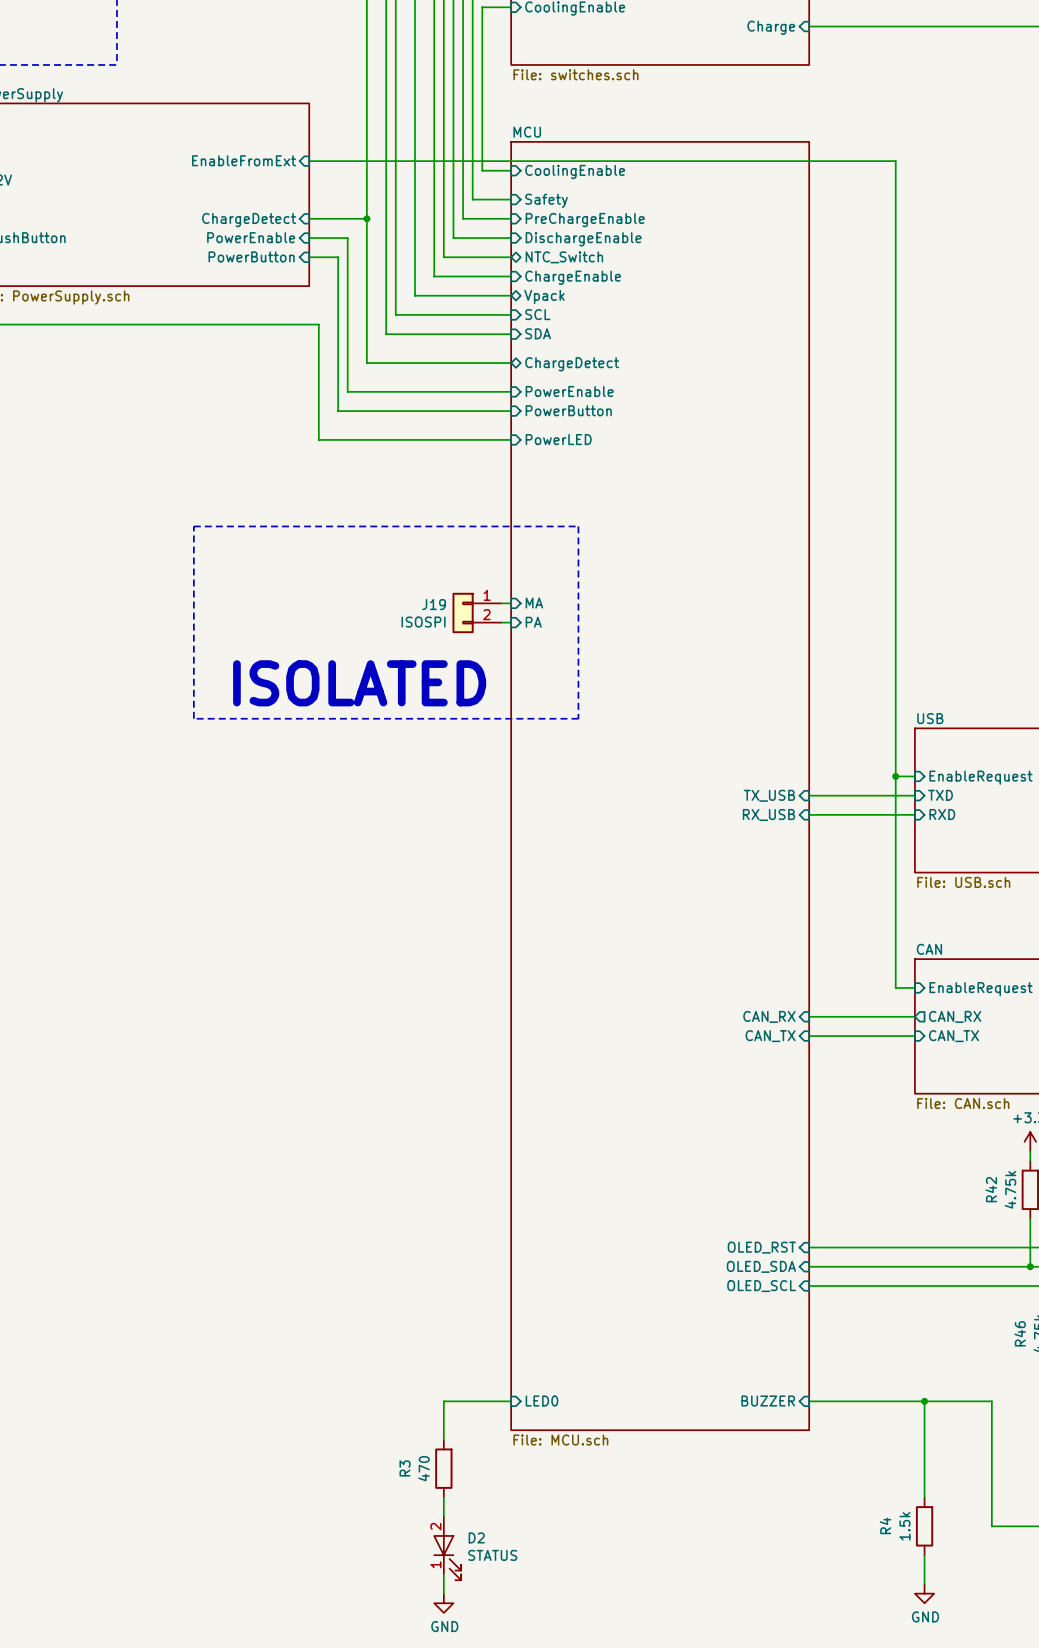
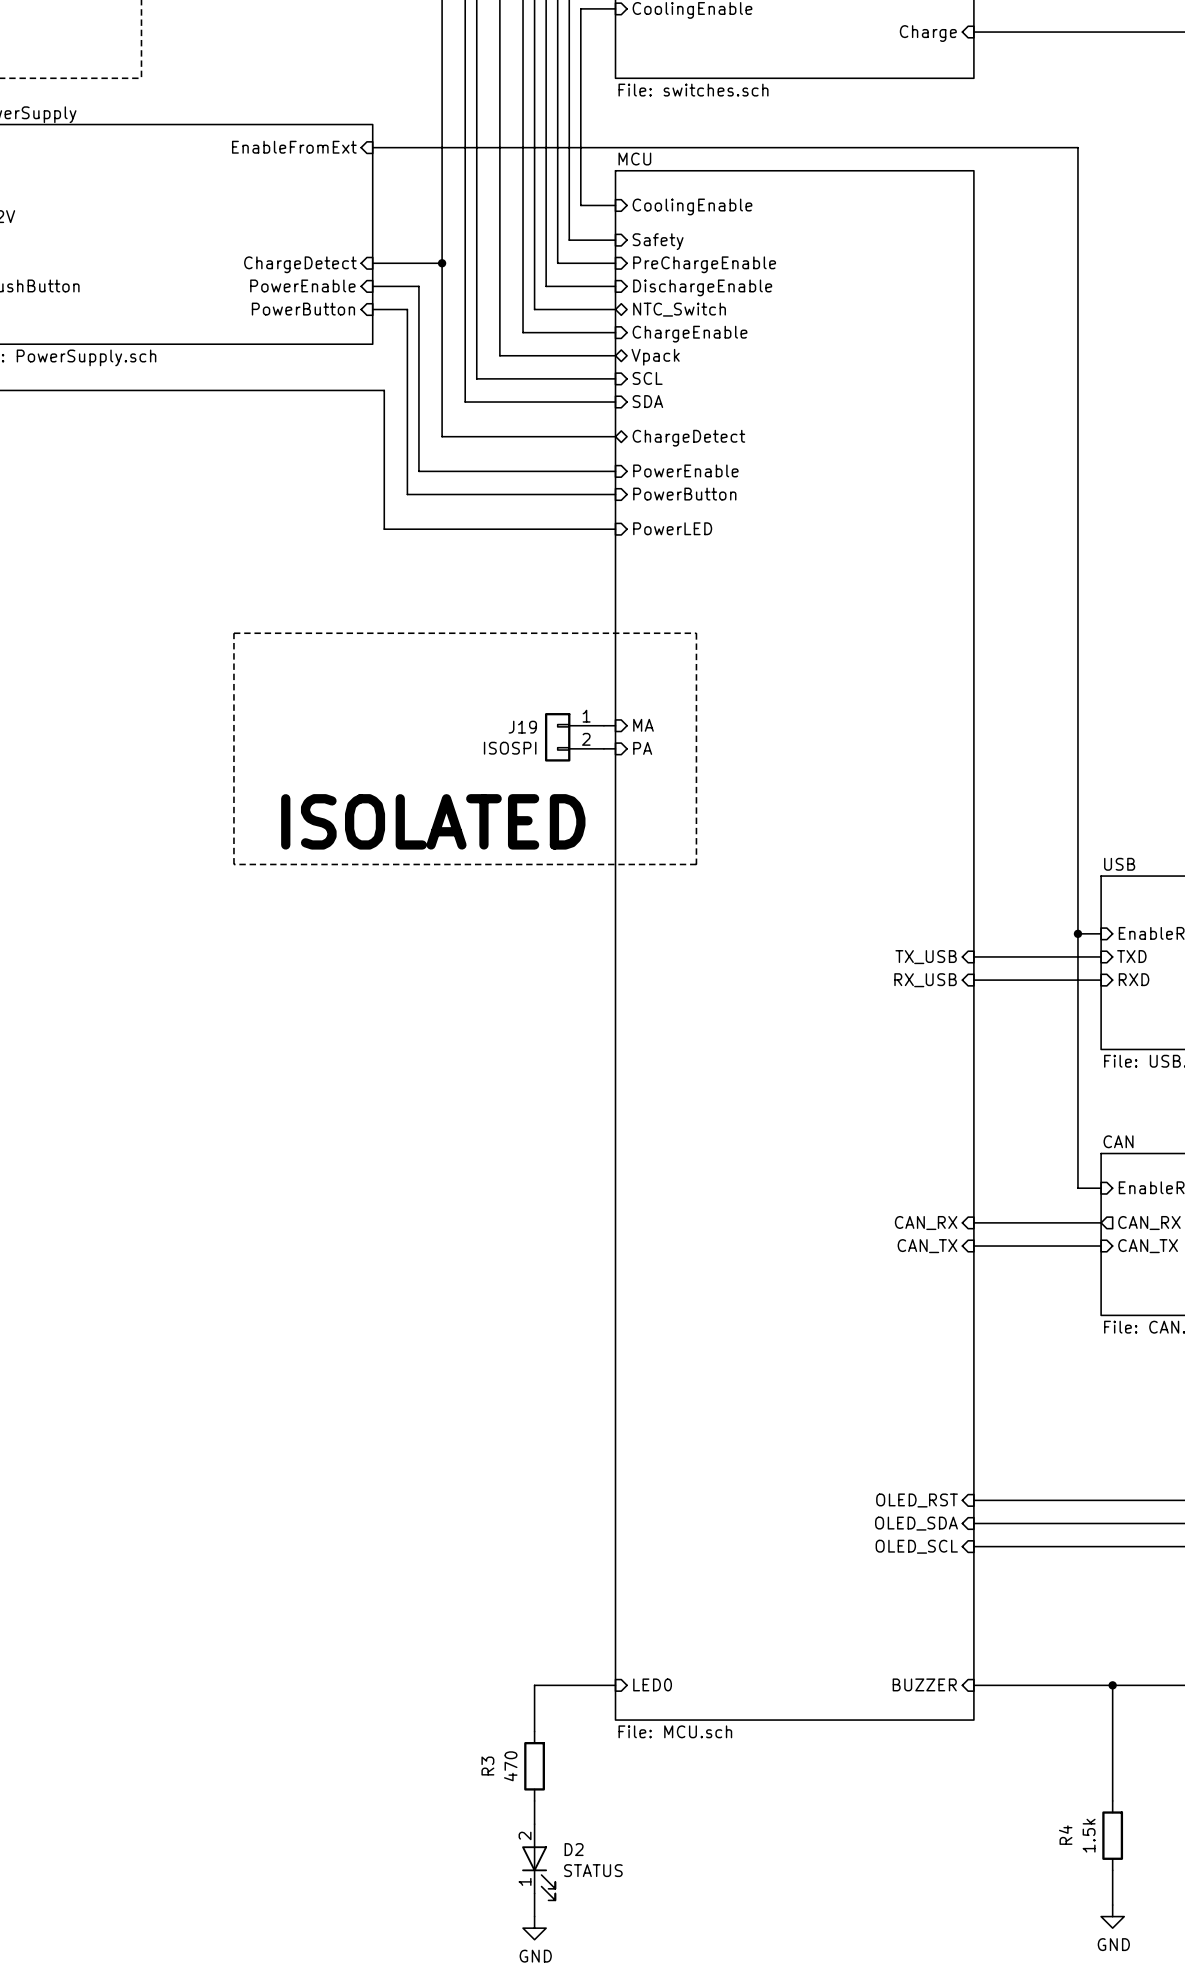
sheet pin position: EnableFromExt (244, 160) -> EnableFromExt (294, 147)
wire: (309, 161) (895, 161) -> (372, 147) (1077, 147) (1077, 193)

